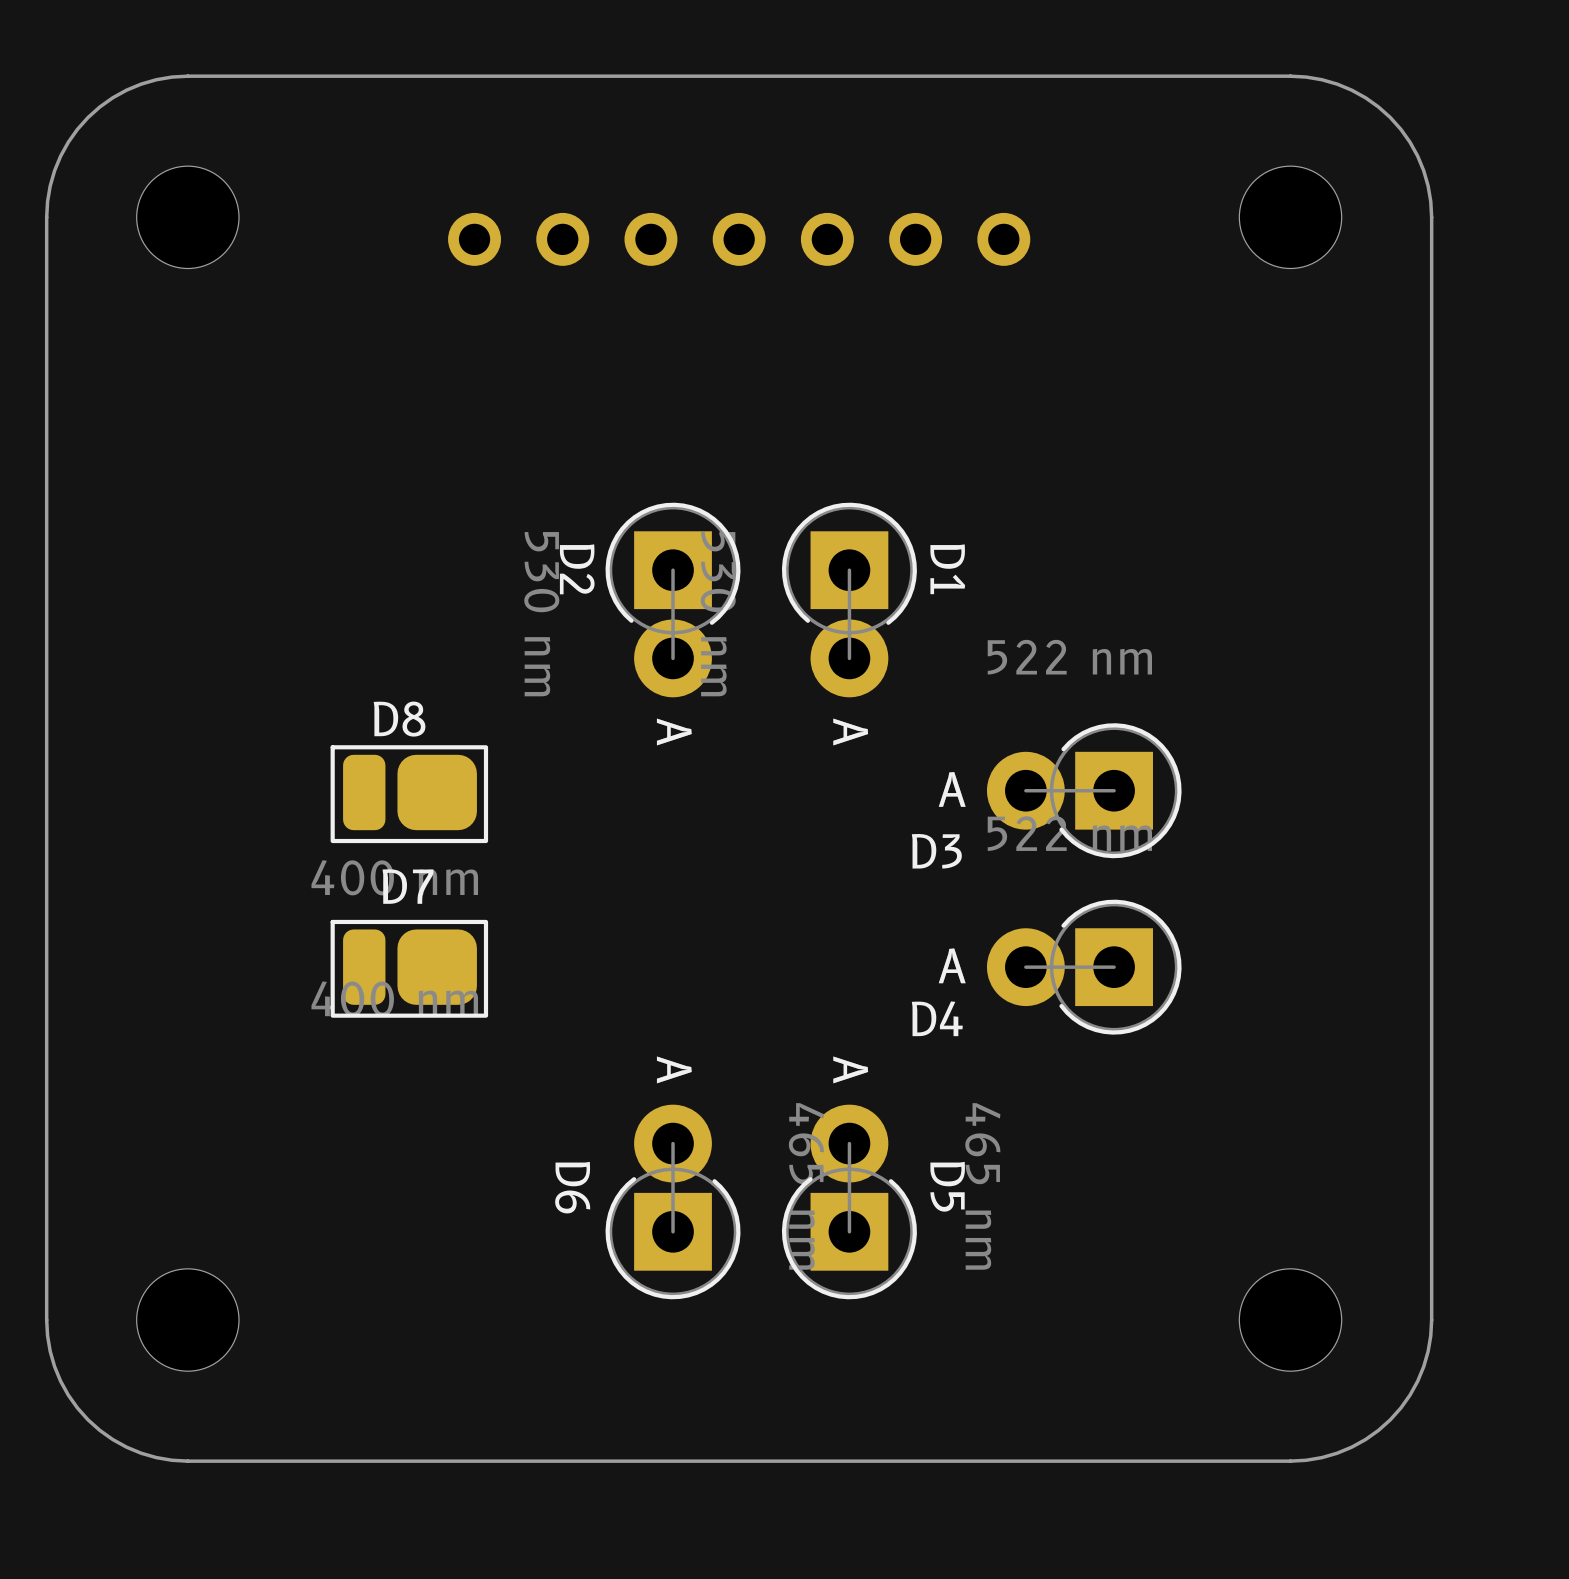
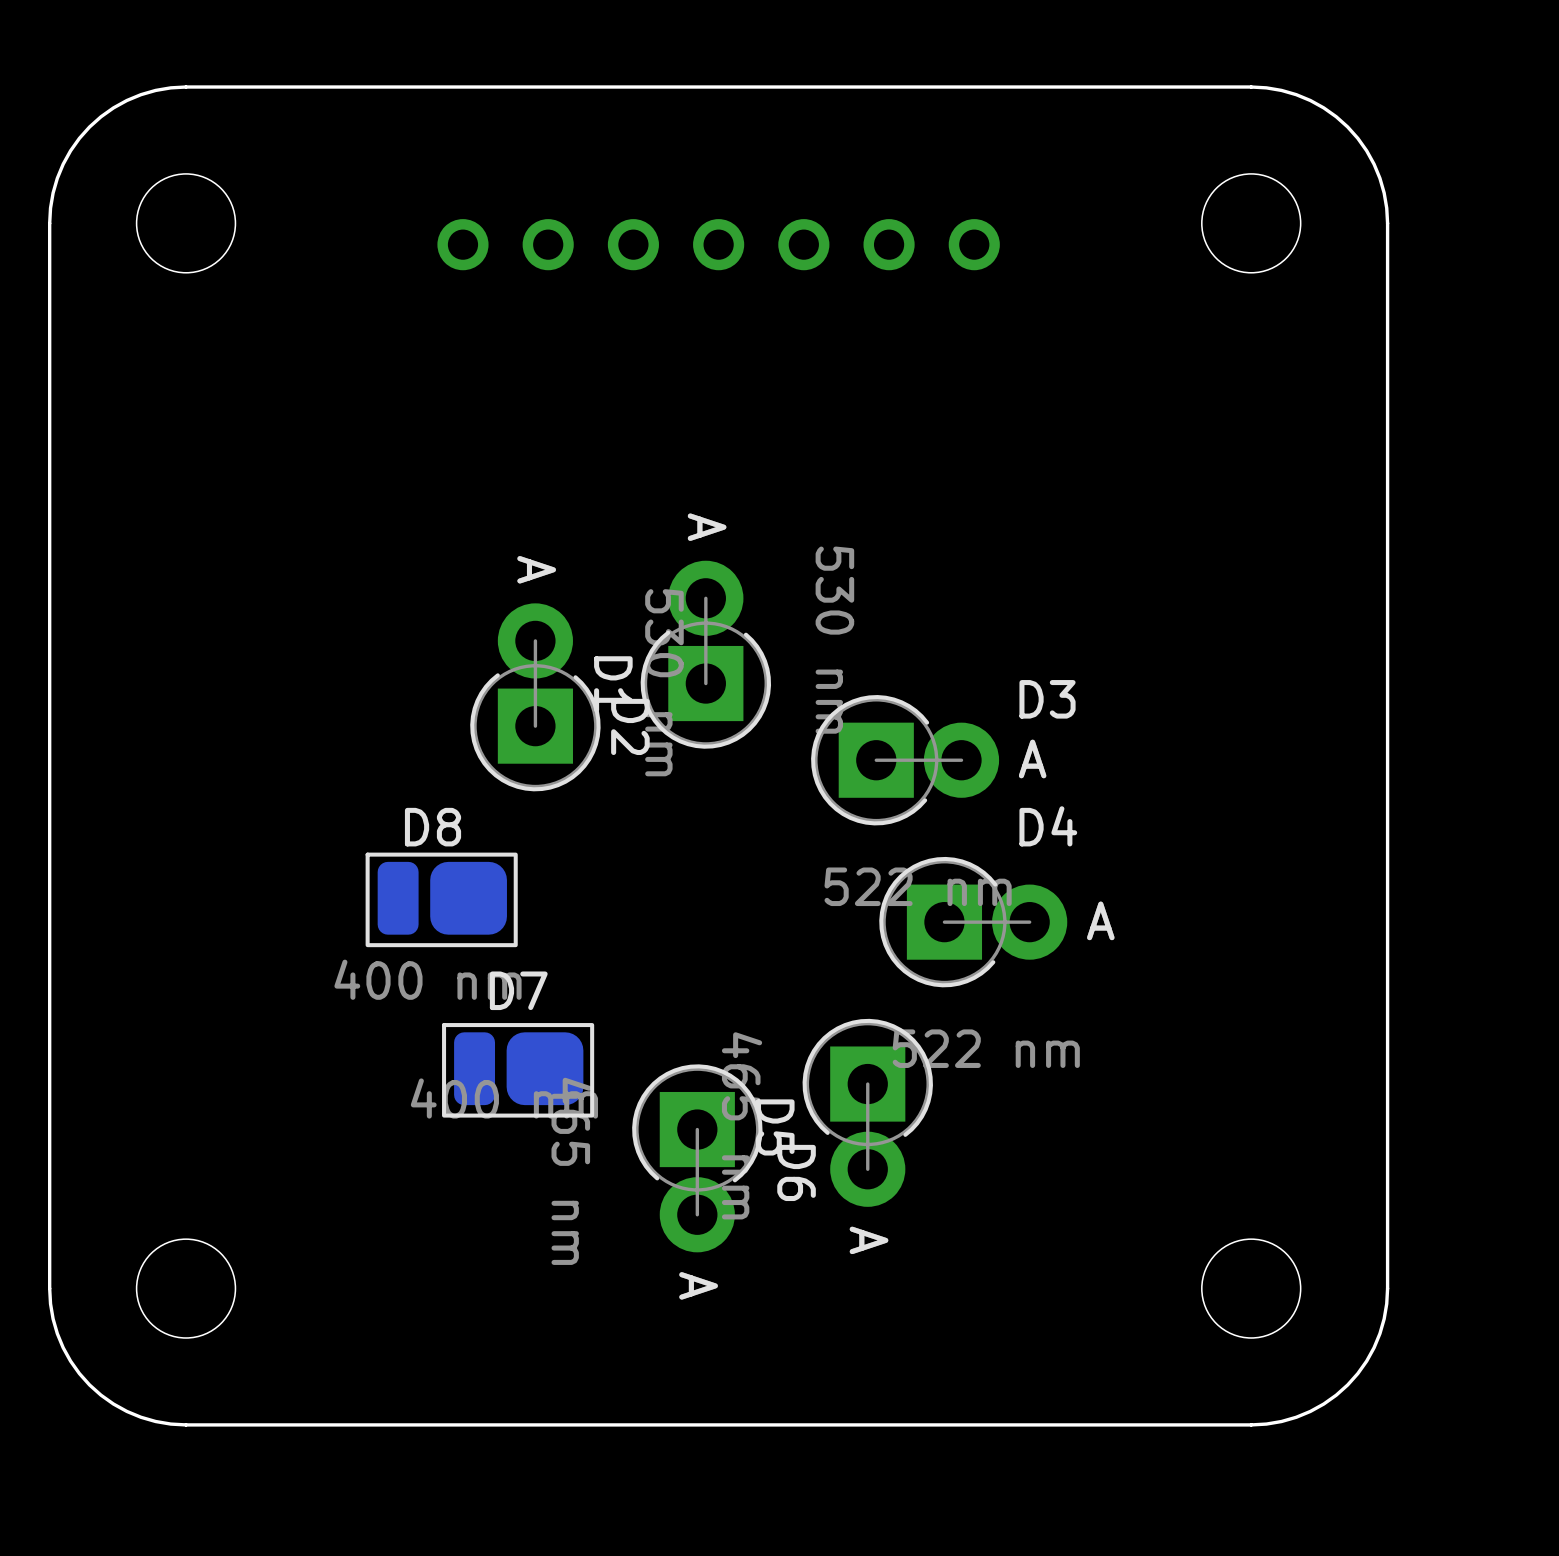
D2 rotation: 0° (673, 600) -> 180° (535, 697)
D2 position: (673, 600) -> (535, 697)
D1 rotation: 0° (849, 600) -> 180° (705, 654)
D1 position: (849, 600) -> (705, 654)
D3 rotation: 0° (1084, 790) -> 180° (905, 760)
D3 position: (1084, 790) -> (905, 760)
D8 position: (409, 794) -> (441, 899)
D4 rotation: 0° (1084, 967) -> 180° (973, 922)
D7 position: (409, 968) -> (518, 1070)
D4 name position: D4 (937, 1018) -> D4 (1048, 826)
D6 rotation: 0° (673, 1201) -> 180° (697, 1158)
D5 rotation: 0° (849, 1201) -> 180° (867, 1112)

